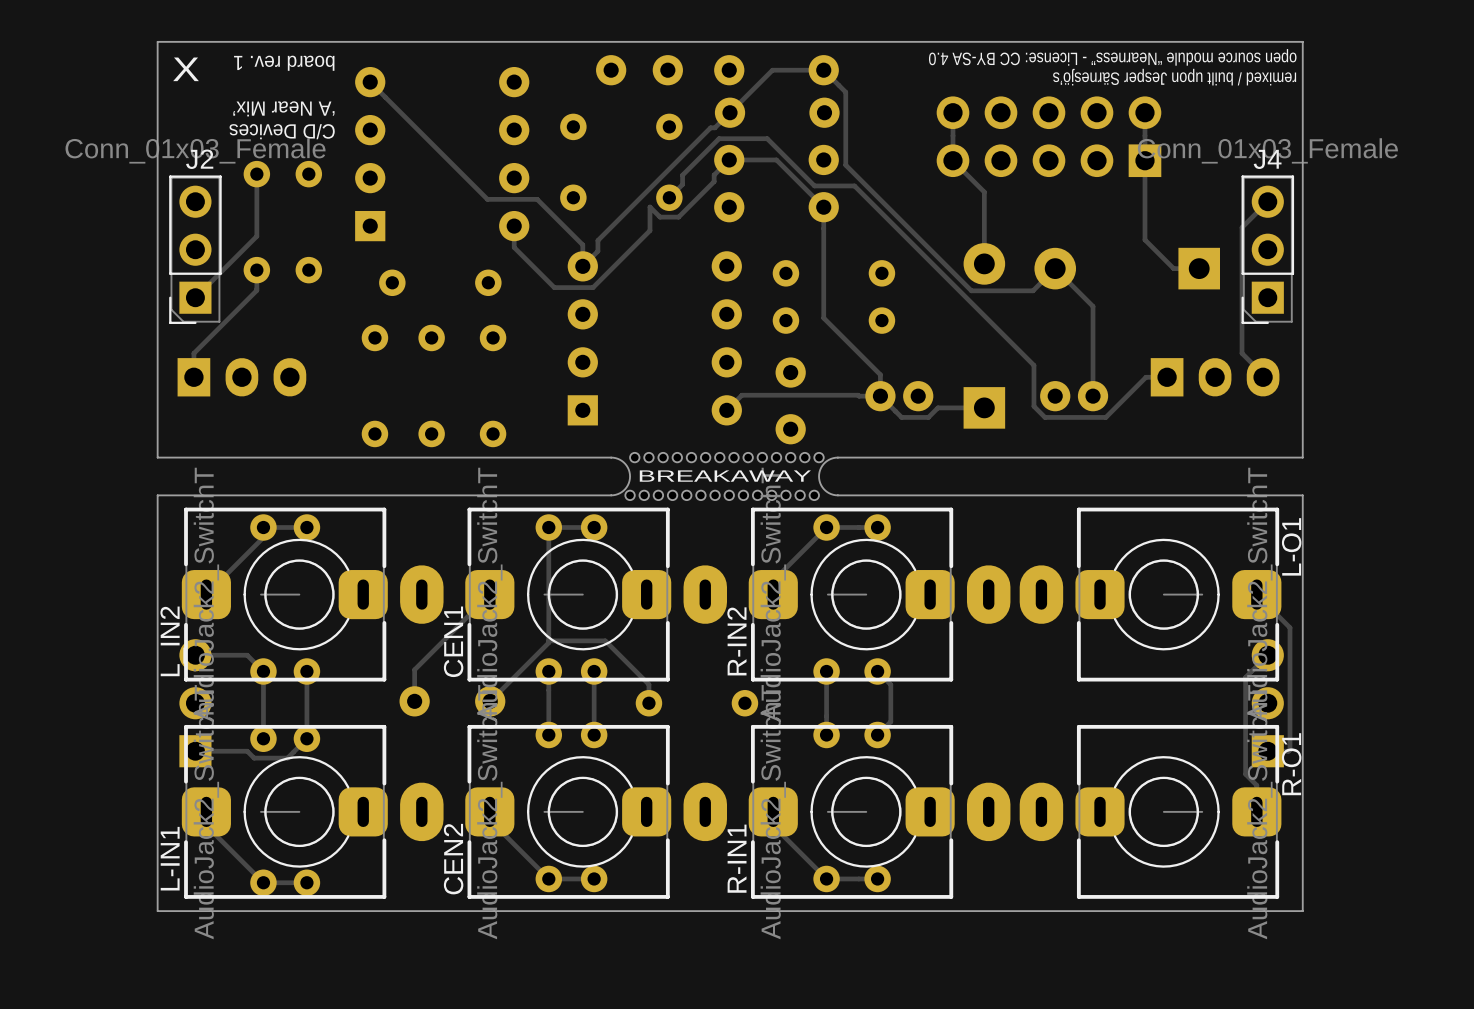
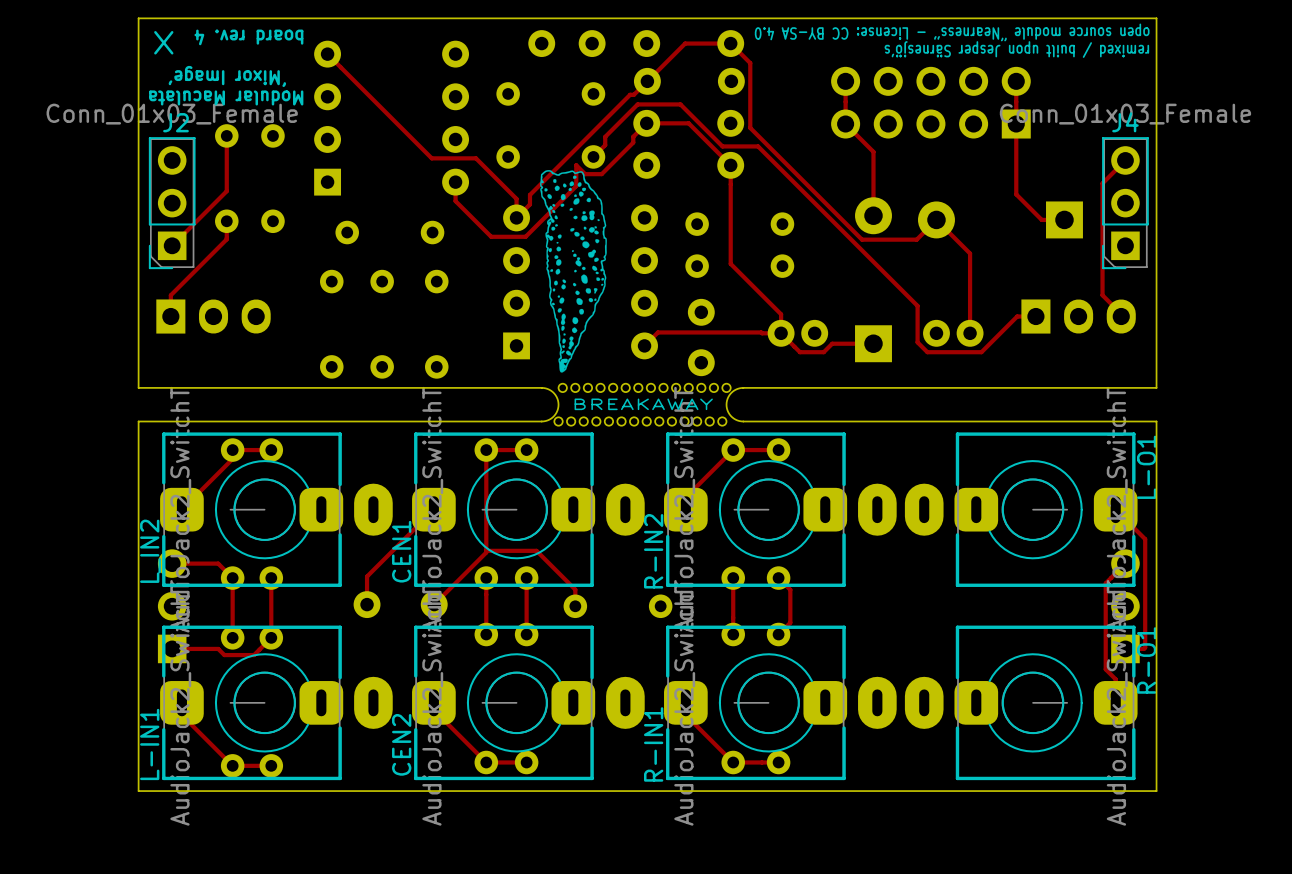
text: board rev. 1 (284, 63) -> board rev. 4 (248, 37)
text: ‘A Near Mix’ (283, 108) -> ‘Mixor Image’ (227, 76)
text: C/D Devices (282, 131) -> Modular Maculata (226, 97)
drawing: none -> [540, 170, 607, 373]

